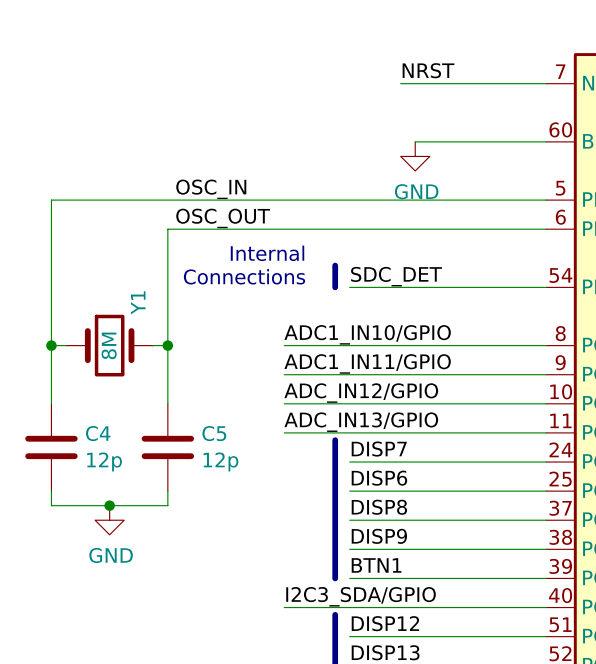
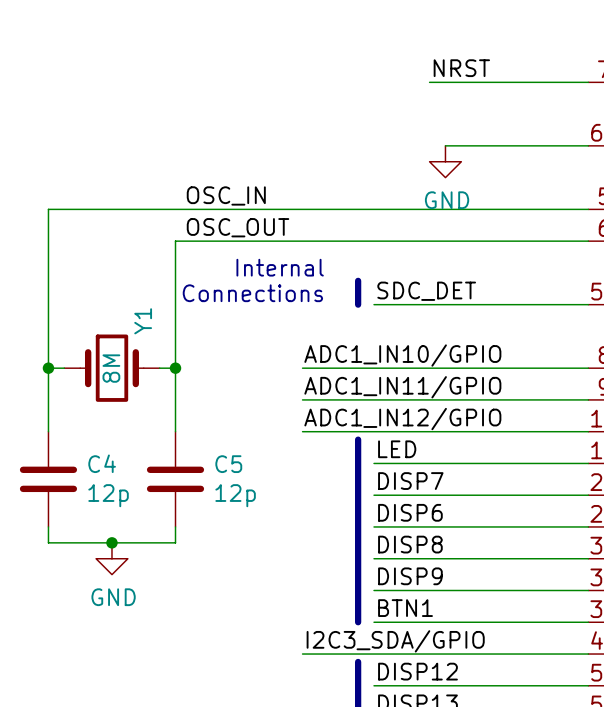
label: ADC_IN12/GPIO (361, 393) -> ADC1_IN12/GPIO (402, 419)
line: none -> (358, 439) (358, 471)
label: none -> LED (397, 449)
label: ADC_IN13/GPIO (361, 422) -> none
wire: (284, 432) (349, 432) -> none

